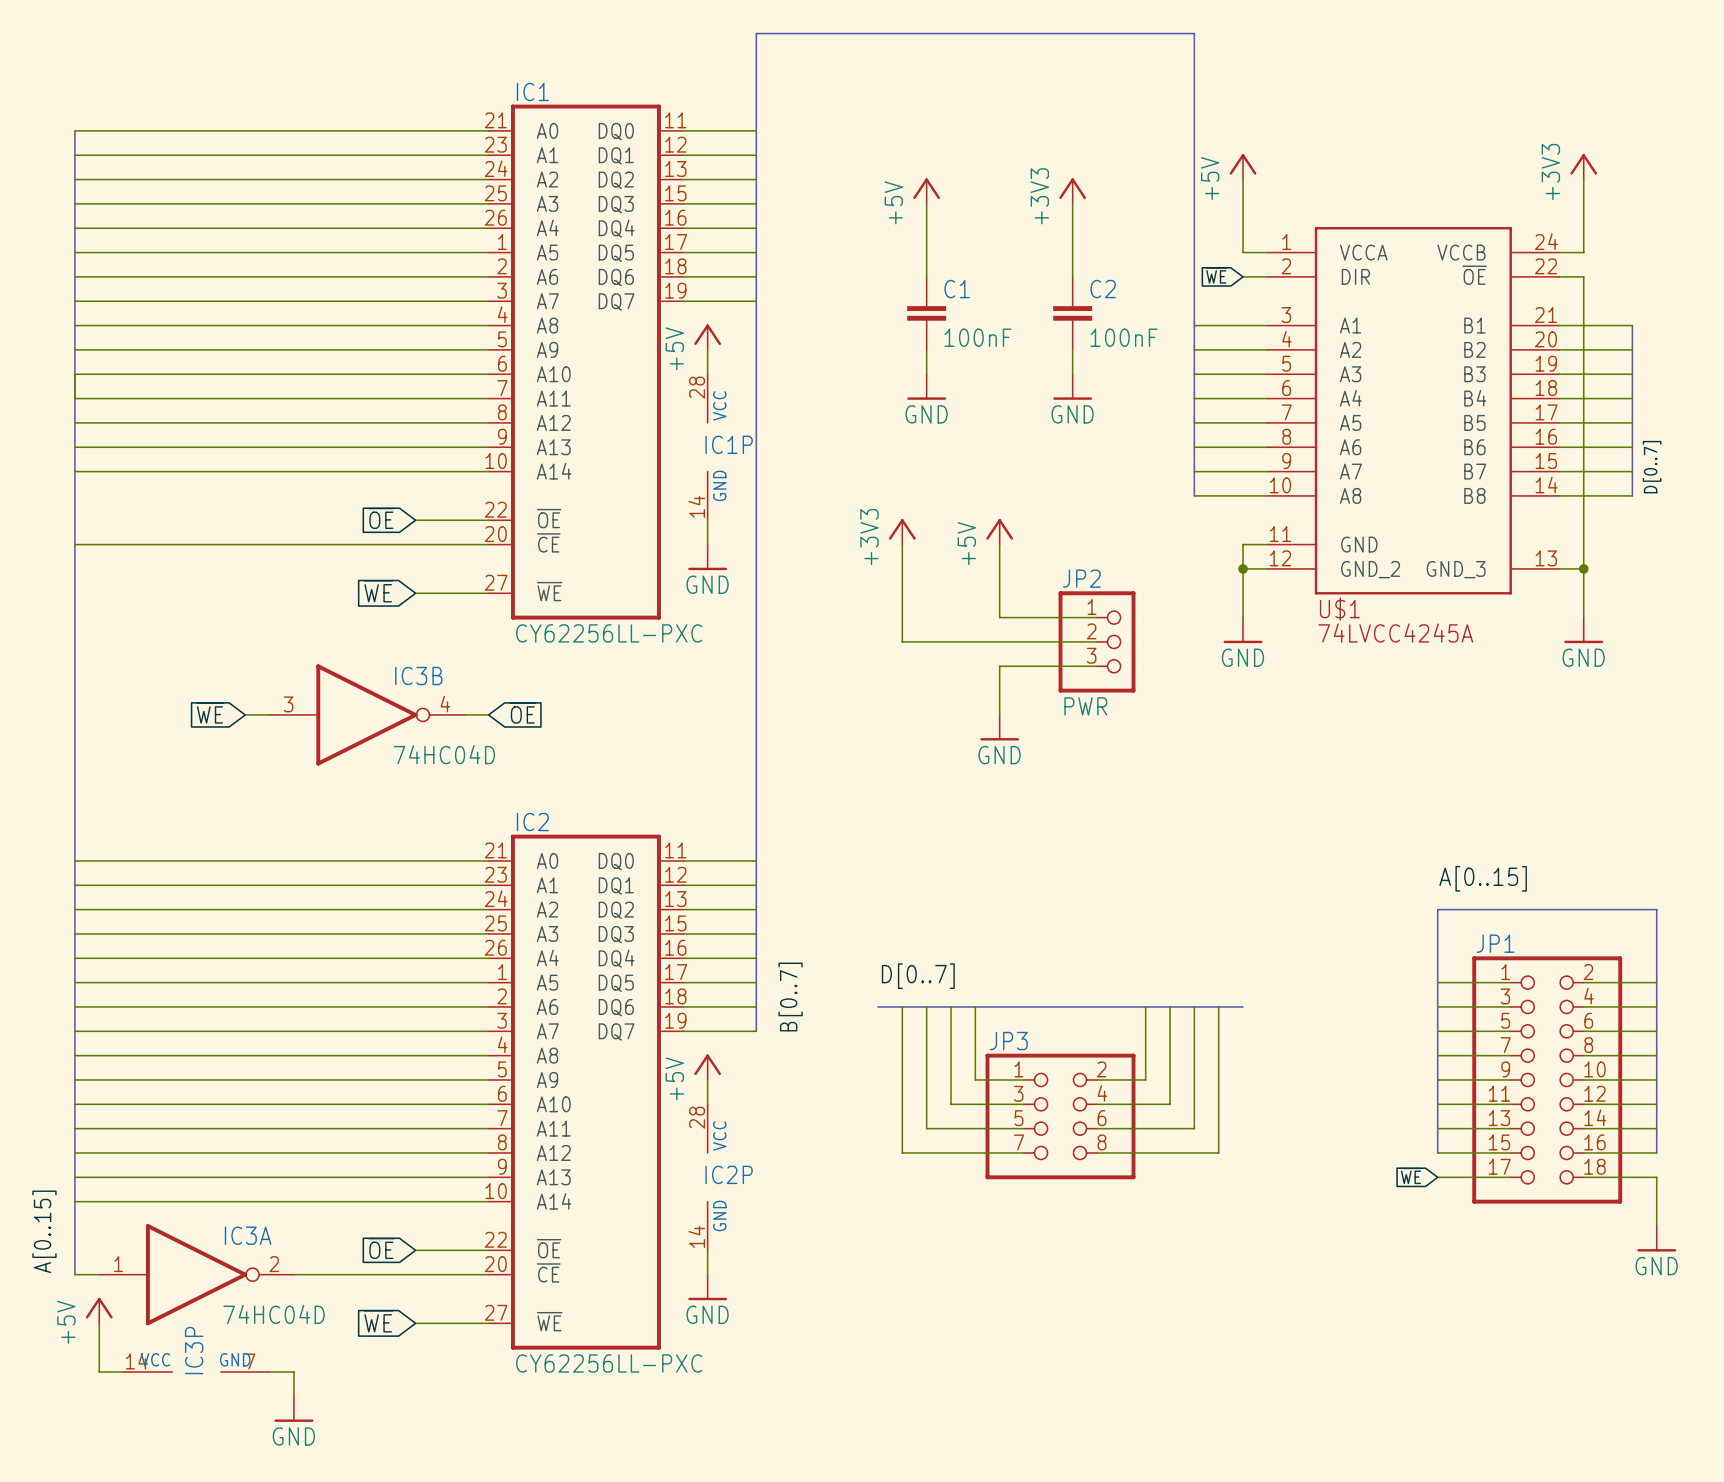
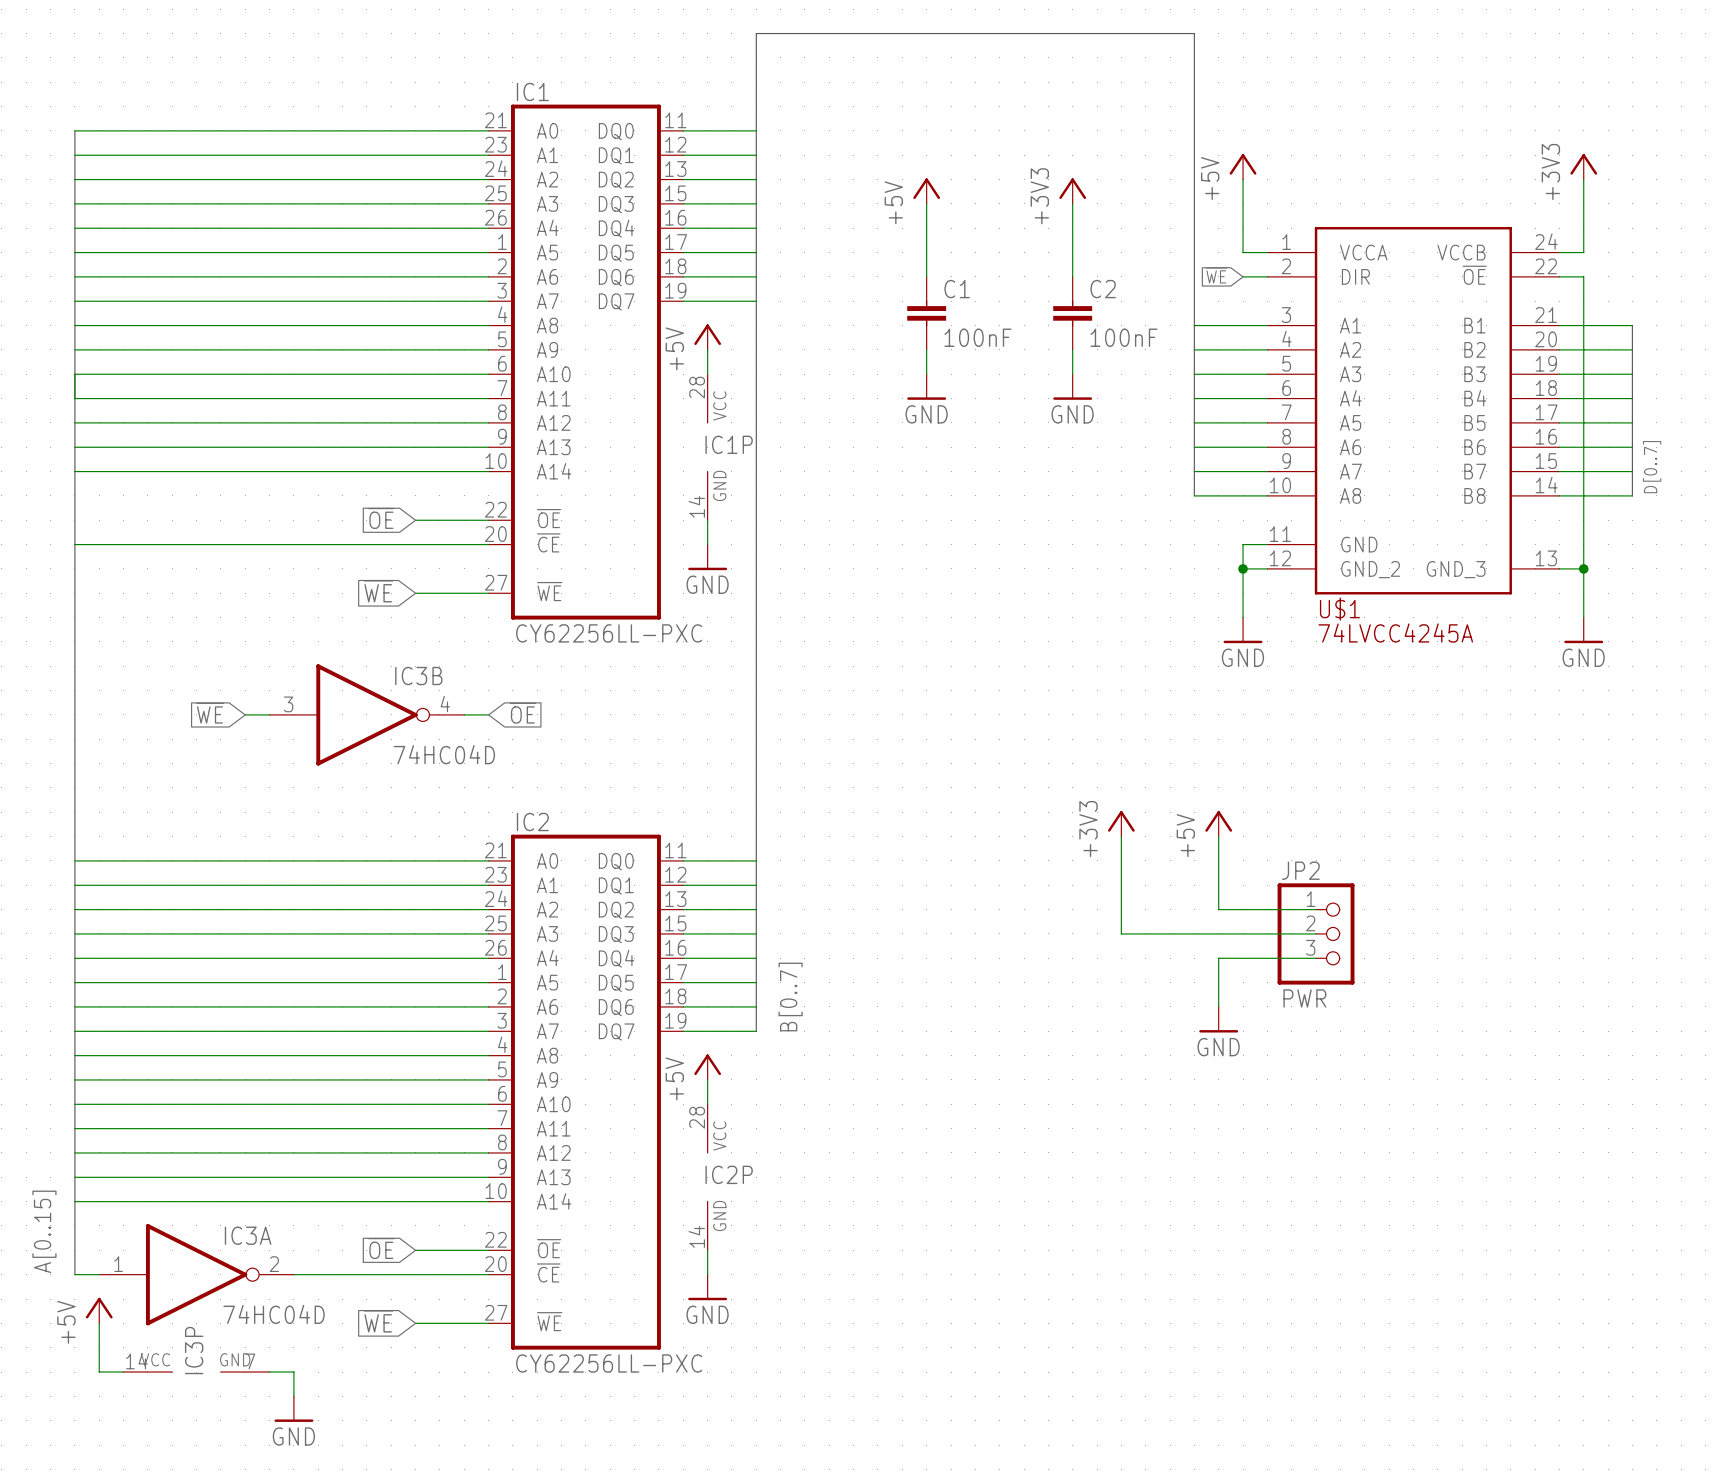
power symbol: +3V3 (902, 531) -> none
power symbol: +5V (999, 531) -> none
wire: (902, 544) (902, 641) (1097, 641) -> none
wire: (999, 544) (999, 617) (1097, 617) -> none
JP2 position: (1097, 641) -> (1316, 933)
wire: (1097, 666) (999, 666) (999, 714) -> none
power symbol: GND (999, 727) -> none
power symbol: none -> +3V3 (1121, 823)
power symbol: none -> +5V (1218, 823)
wire: none -> (1121, 836) (1121, 933) (1316, 933)
wire: none -> (1218, 836) (1218, 909) (1316, 909)
label: A[0..15] (1483, 878) -> none
label: D[0..7] (918, 976) -> none
wire: (1437, 982) (1510, 982) -> none
wire: (1583, 982) (1656, 982) -> none
bus: (877, 1006) (1243, 1006) -> none
wire: (902, 1006) (902, 1152) (1024, 1152) -> none
wire: (926, 1006) (926, 1128) (1024, 1128) -> none
wire: (951, 1006) (951, 1104) (1024, 1104) -> none
wire: (975, 1006) (975, 1079) (1024, 1079) -> none
wire: (1145, 1006) (1145, 1079) (1097, 1079) -> none
wire: (1170, 1006) (1170, 1104) (1097, 1104) -> none
wire: (1194, 1006) (1194, 1128) (1097, 1128) -> none
wire: (1218, 1006) (1218, 1152) (1097, 1152) -> (1218, 1006) (1218, 958) (1316, 958)
wire: (1437, 1006) (1510, 1006) -> none
wire: (1583, 1006) (1656, 1006) -> none
power symbol: none -> GND (1218, 1019)
wire: (1437, 1031) (1510, 1031) -> none
wire: (1583, 1031) (1656, 1031) -> none
wire: (1437, 1055) (1510, 1055) -> none
wire: (1583, 1055) (1656, 1055) -> none
wire: (1437, 1079) (1510, 1079) -> none
JP1: (1547, 1079) -> none
wire: (1583, 1079) (1656, 1079) -> none
wire: (1437, 1104) (1510, 1104) -> none
wire: (1583, 1104) (1656, 1104) -> none
JP3: (1060, 1116) -> none
wire: (1437, 1128) (1510, 1128) -> none
wire: (1583, 1128) (1656, 1128) -> none
bus: (1437, 1152) (1437, 909) (1656, 909) (1656, 1152) -> none
wire: (1437, 1152) (1510, 1152) -> none
wire: (1583, 1152) (1656, 1152) -> none
global label: ~{WE} (1411, 1175) -> none
wire: (1437, 1177) (1510, 1177) -> none
wire: (1583, 1177) (1656, 1177) (1656, 1225) -> none
power symbol: GND (1656, 1238) -> none

